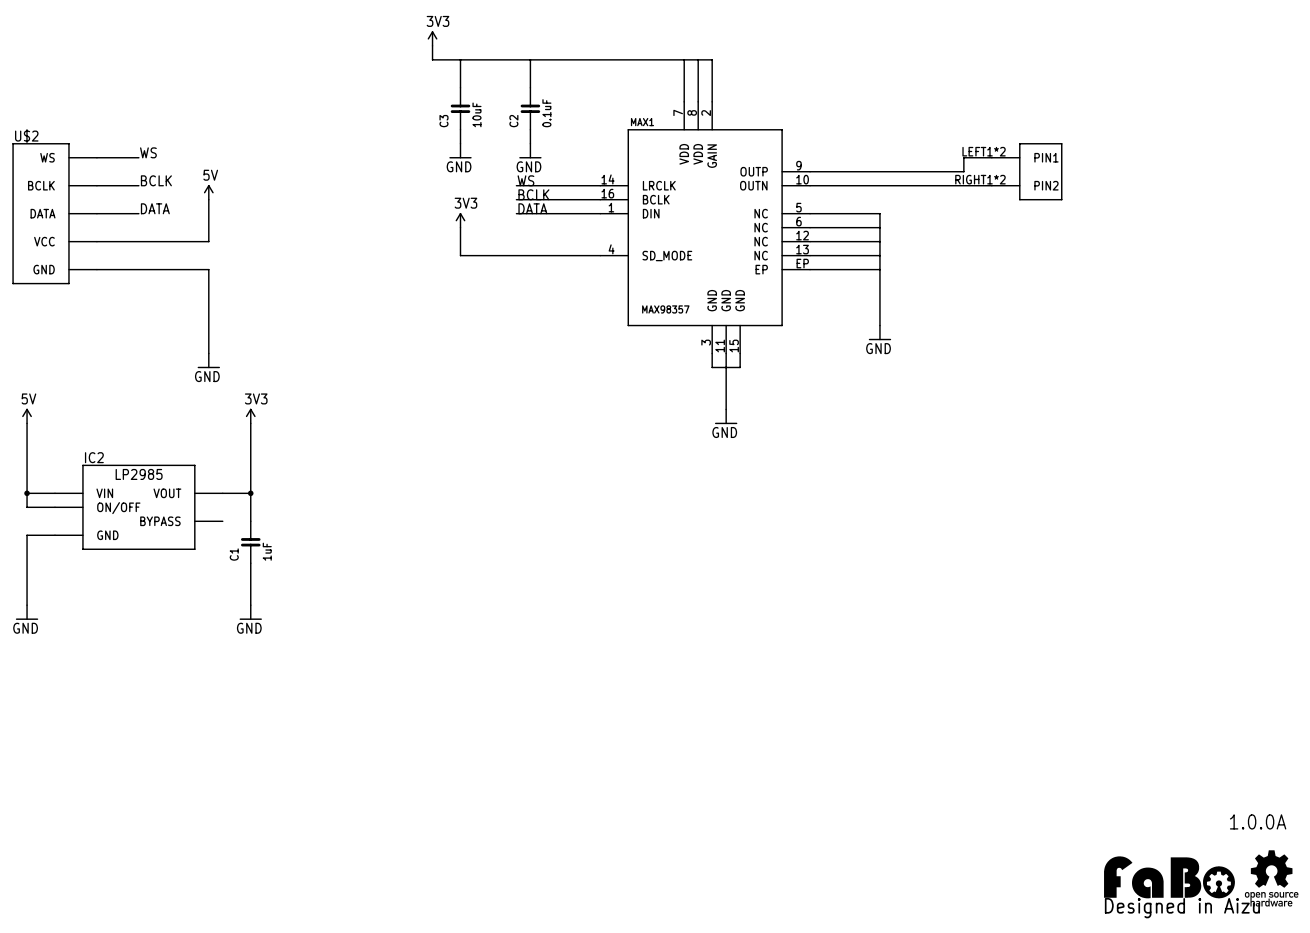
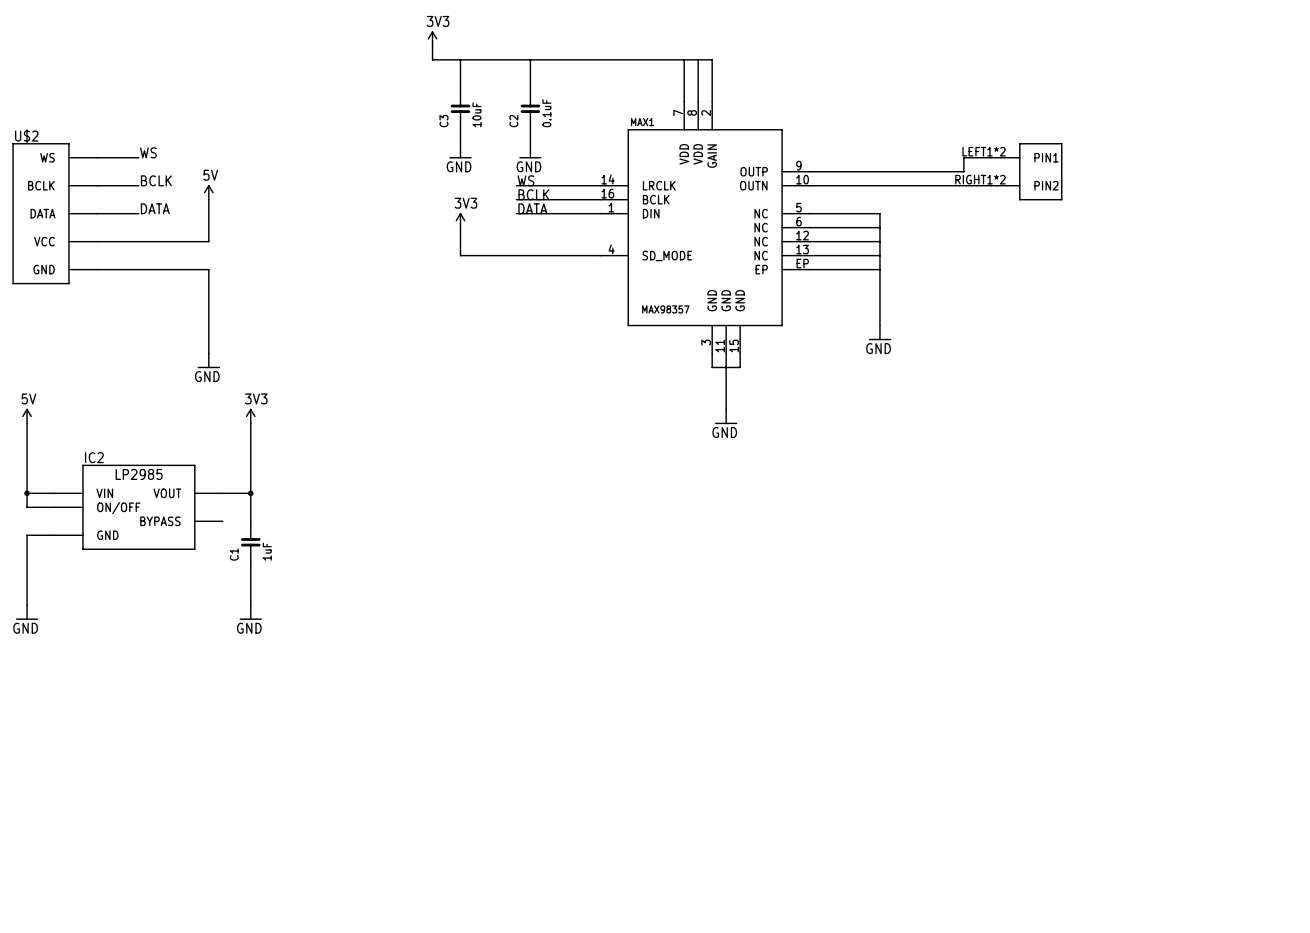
text: 1.0.0A (1258, 821) -> none
part: (1169, 877) -> none
part: (1271, 878) -> none

